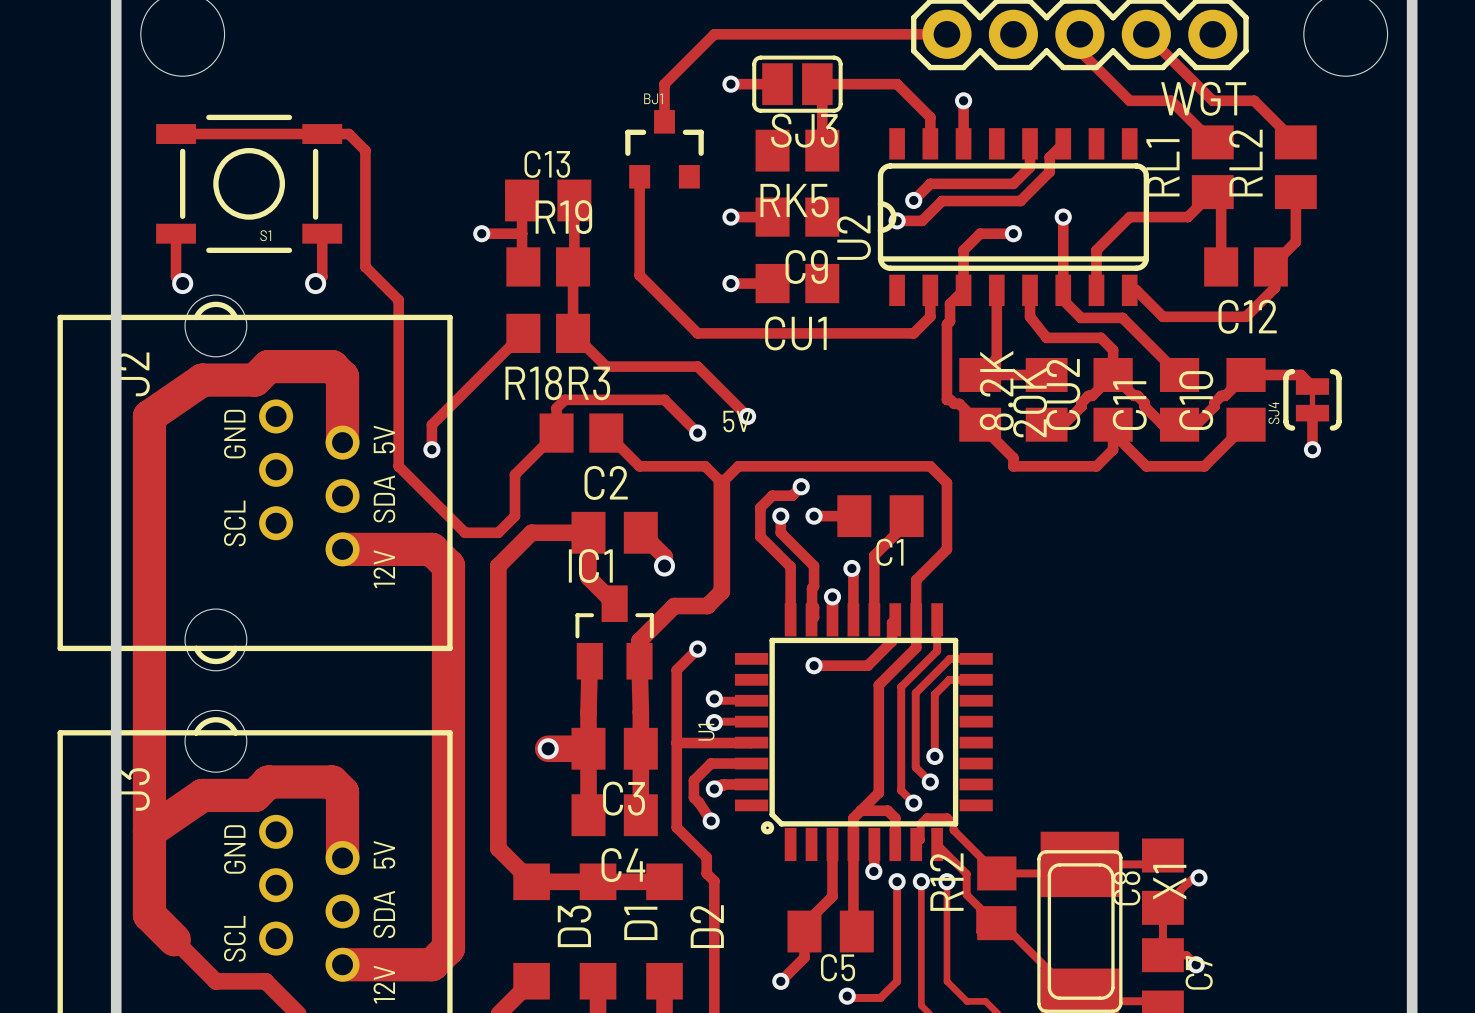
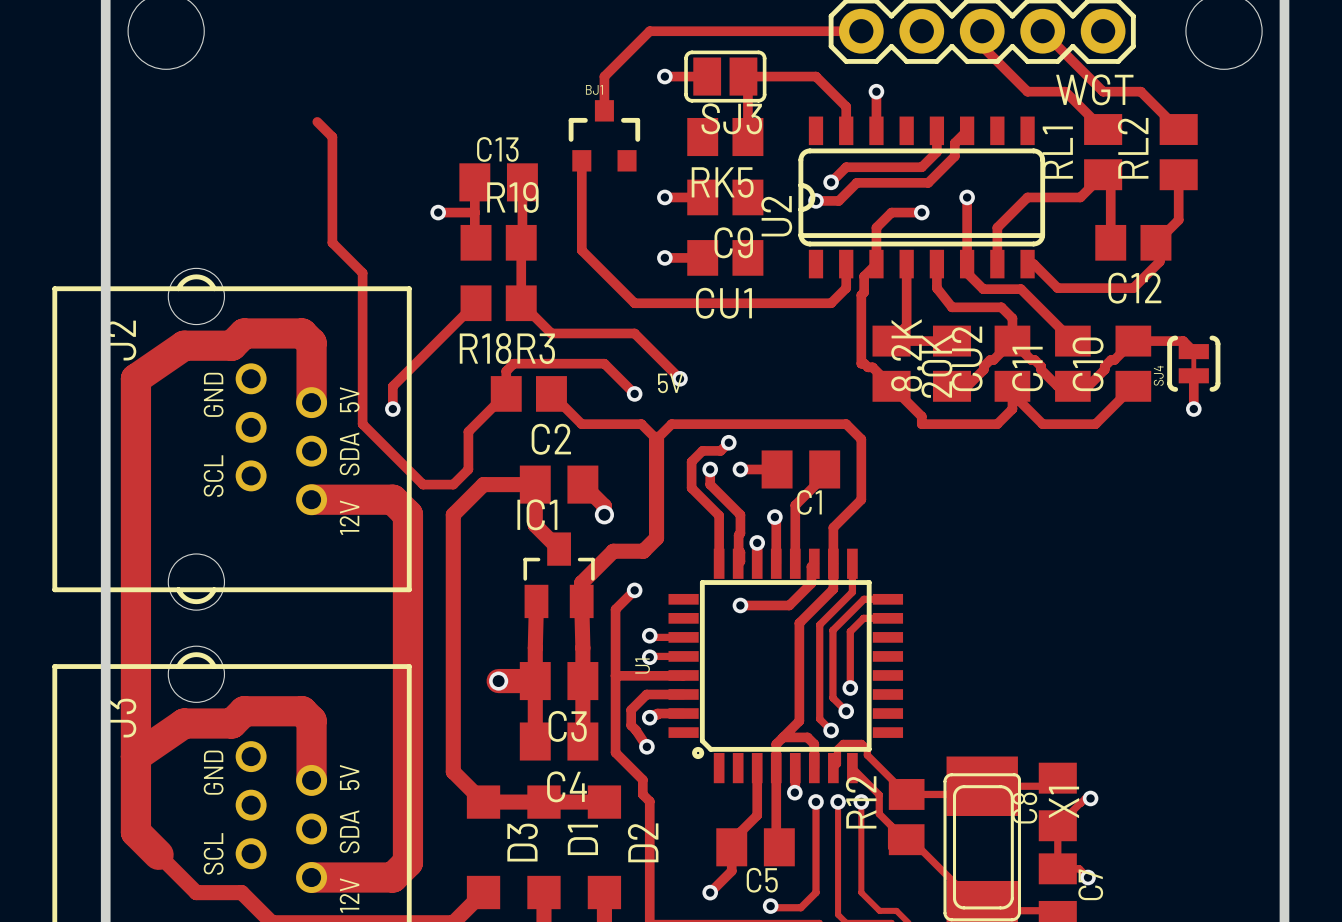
track: (176, 134) (348, 134) -> none
S1: (249, 183) -> none
track: (176, 233) (176, 276) (182, 283) -> none
track: (322, 233) (322, 276) (315, 283) -> none
via: (182, 283) -> none
via: (315, 283) -> none

